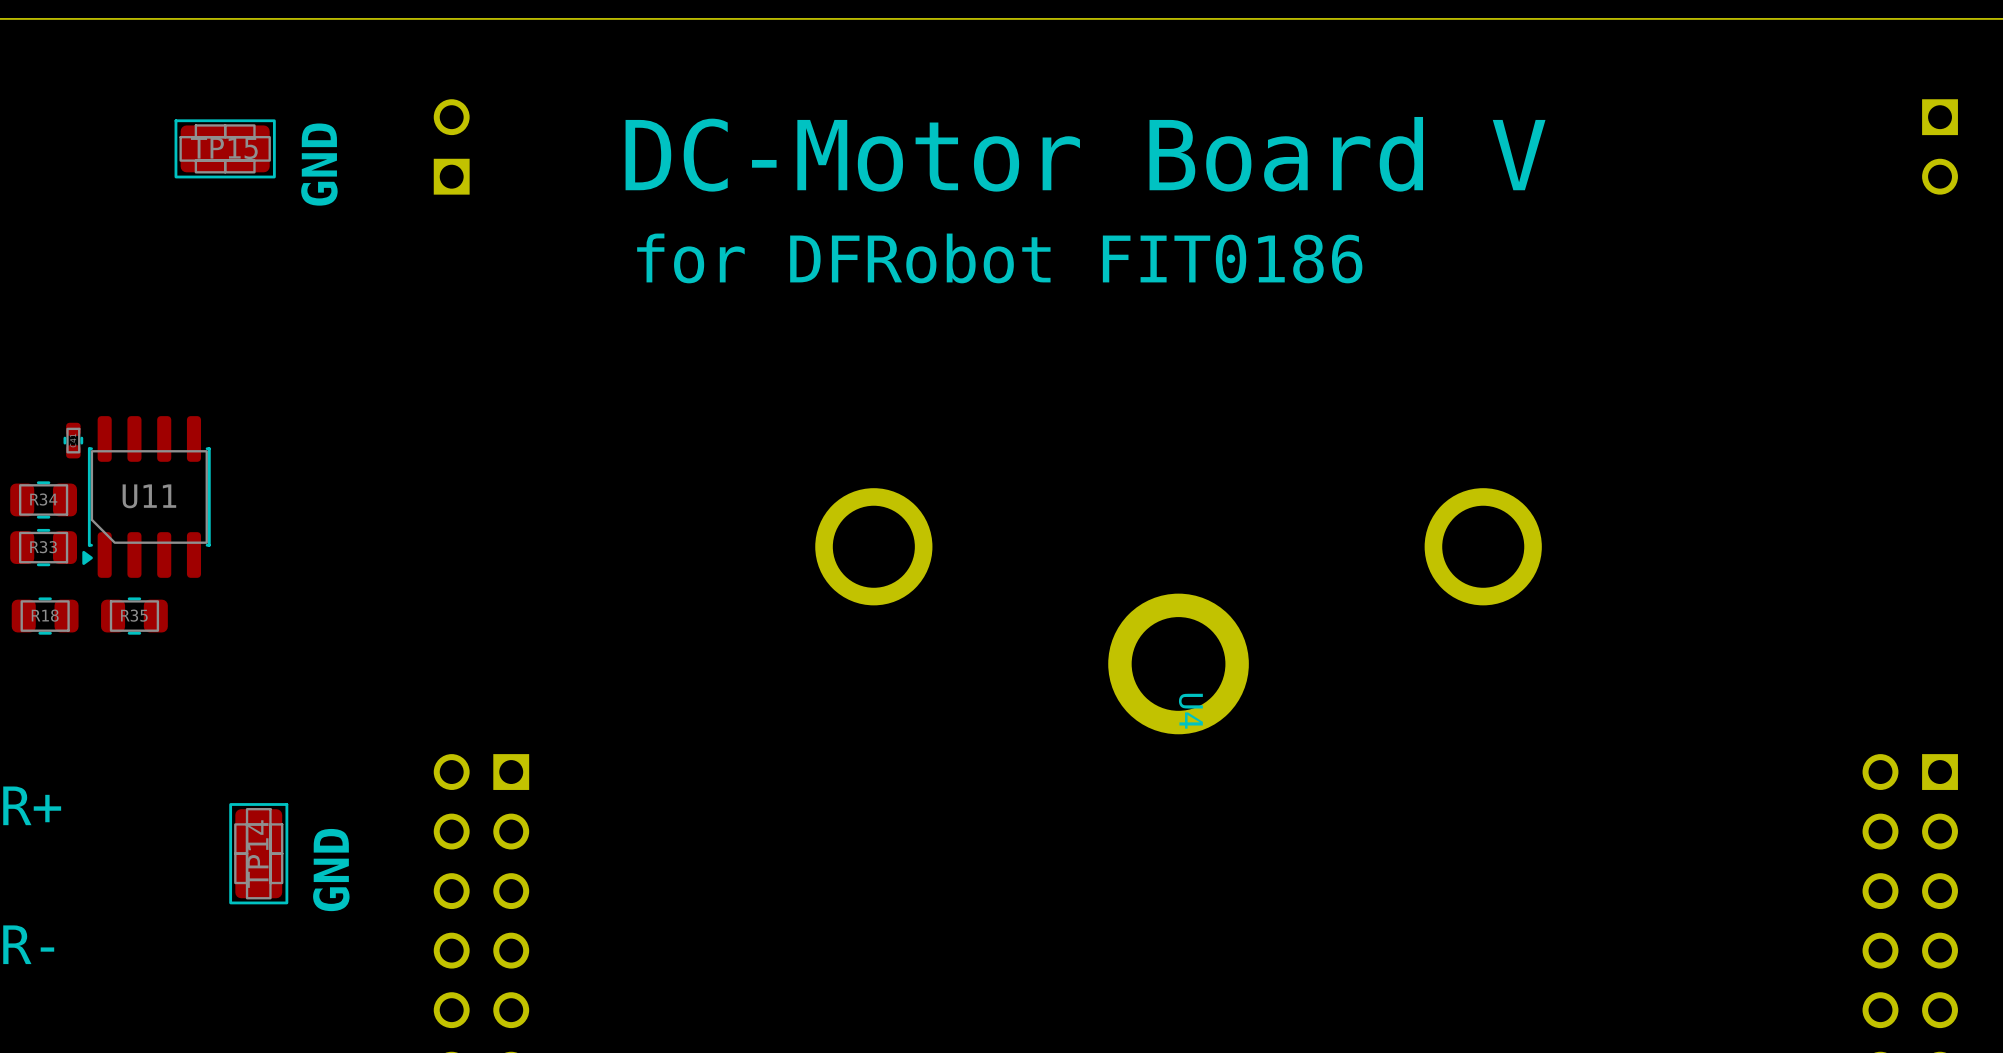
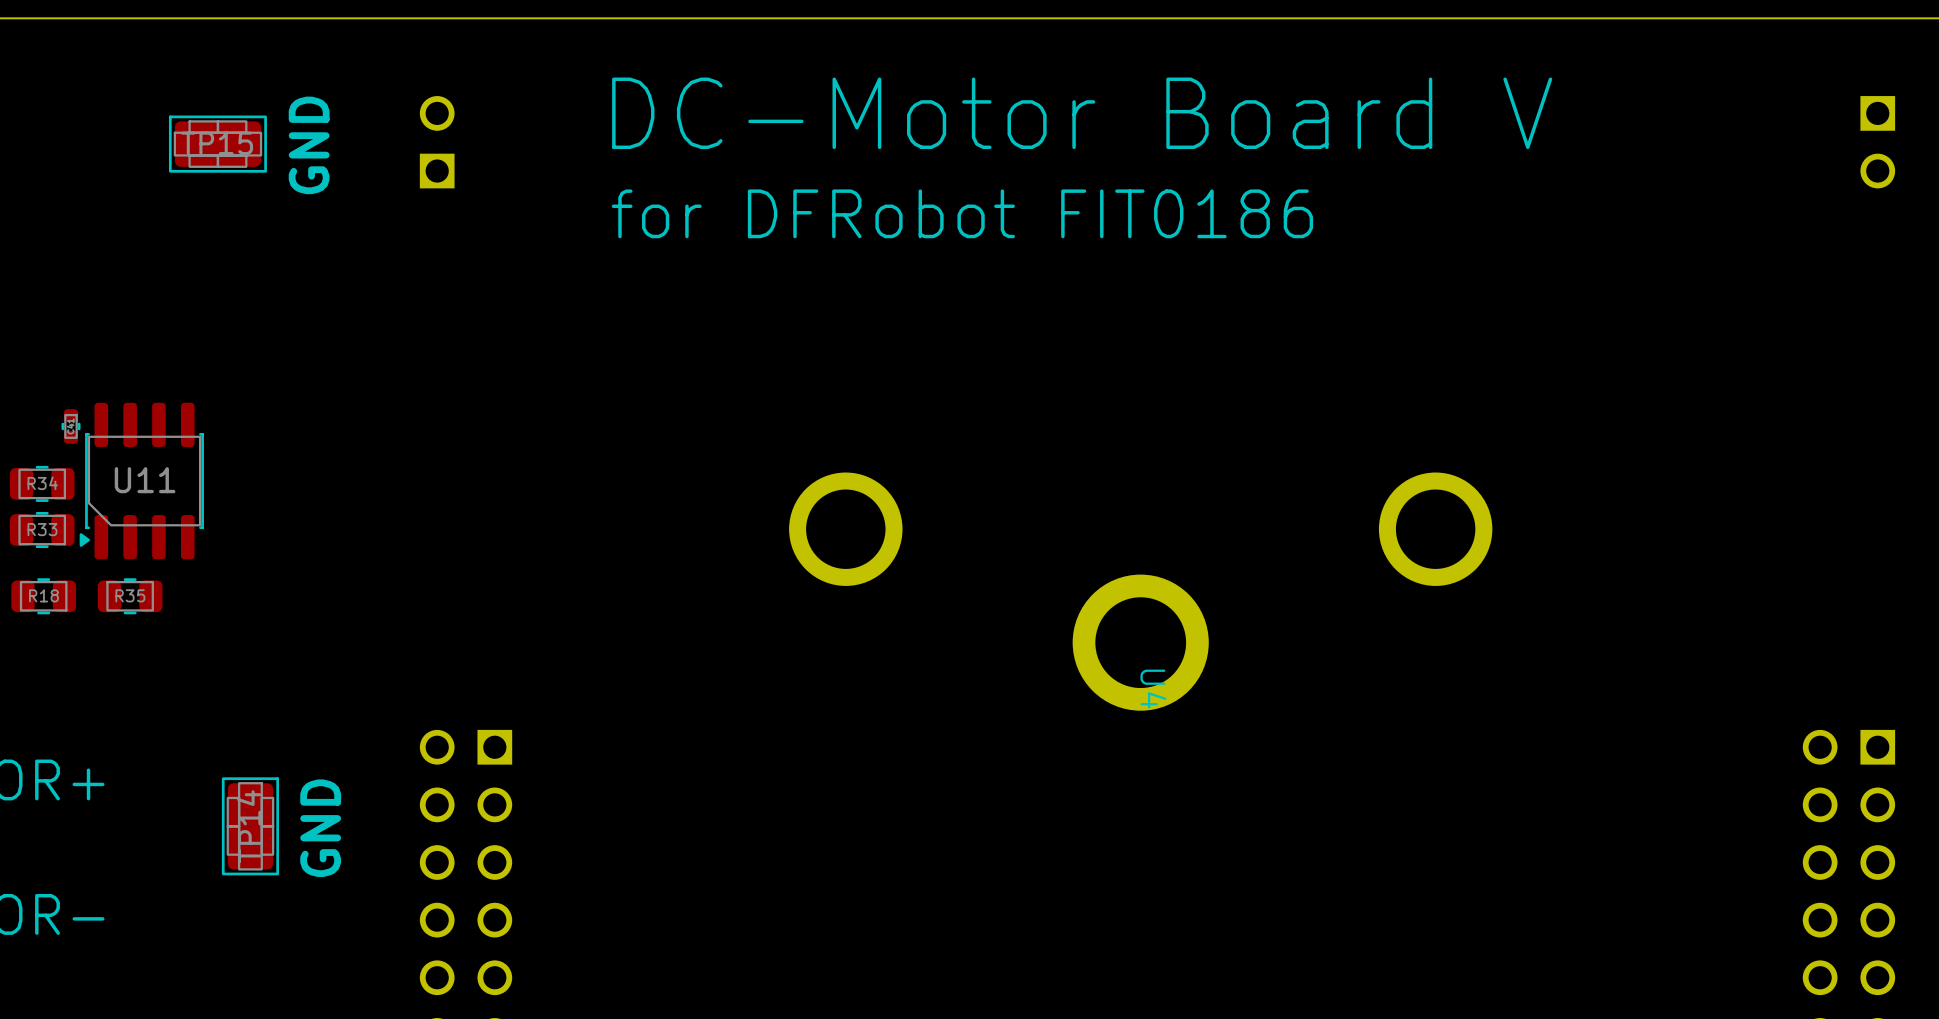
text position: DC-Motor Board V (1085, 154) -> DC-Motor Board V (1082, 113)
text position: for DFRobot FIT0186 (999, 258) -> for DFRobot FIT0186 (962, 213)

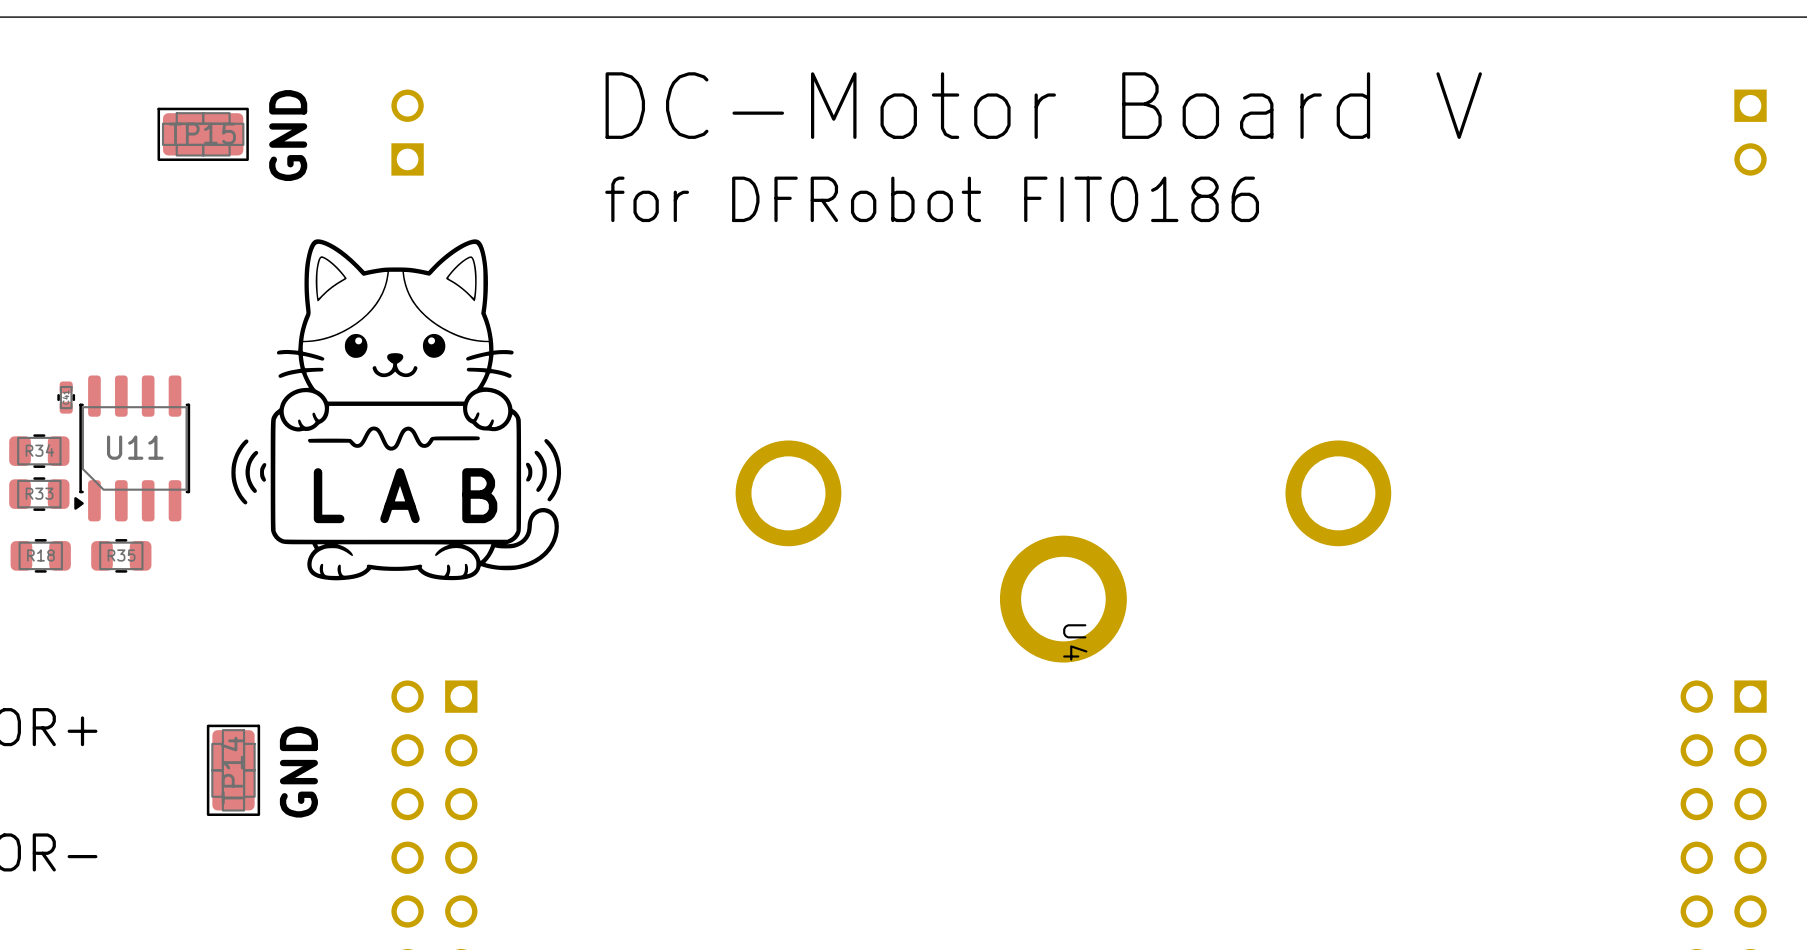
text position: DC-Motor Board V (1082, 113) -> DC-Motor Board V (1043, 105)
text position: for DFRobot FIT0186 (962, 213) -> for DFRobot FIT0186 (932, 199)
drawing: none -> [231, 239, 562, 581]

